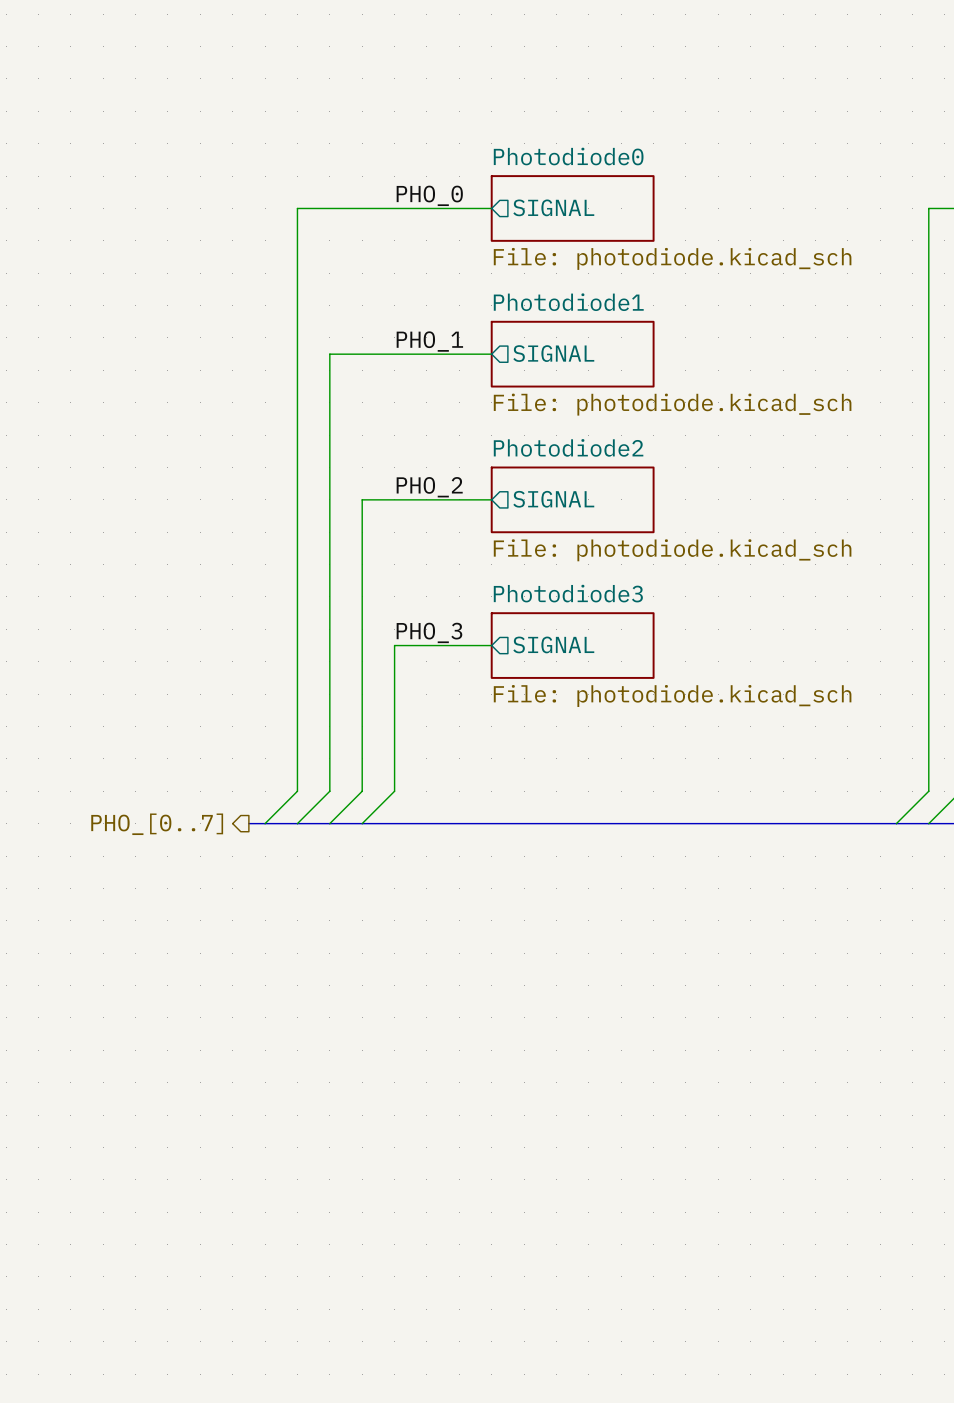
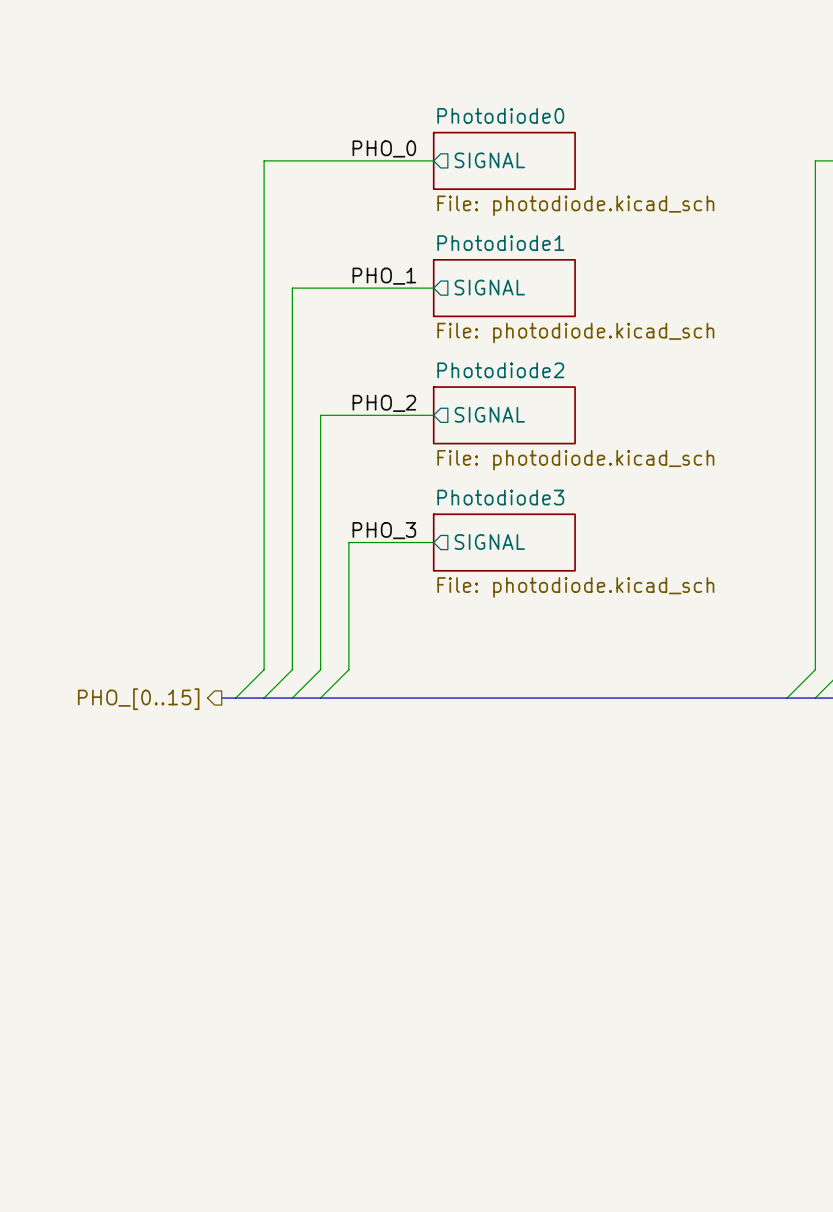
hierarchical label: PHO_[0..7] (157, 824) -> PHO_[0..15] (138, 699)

